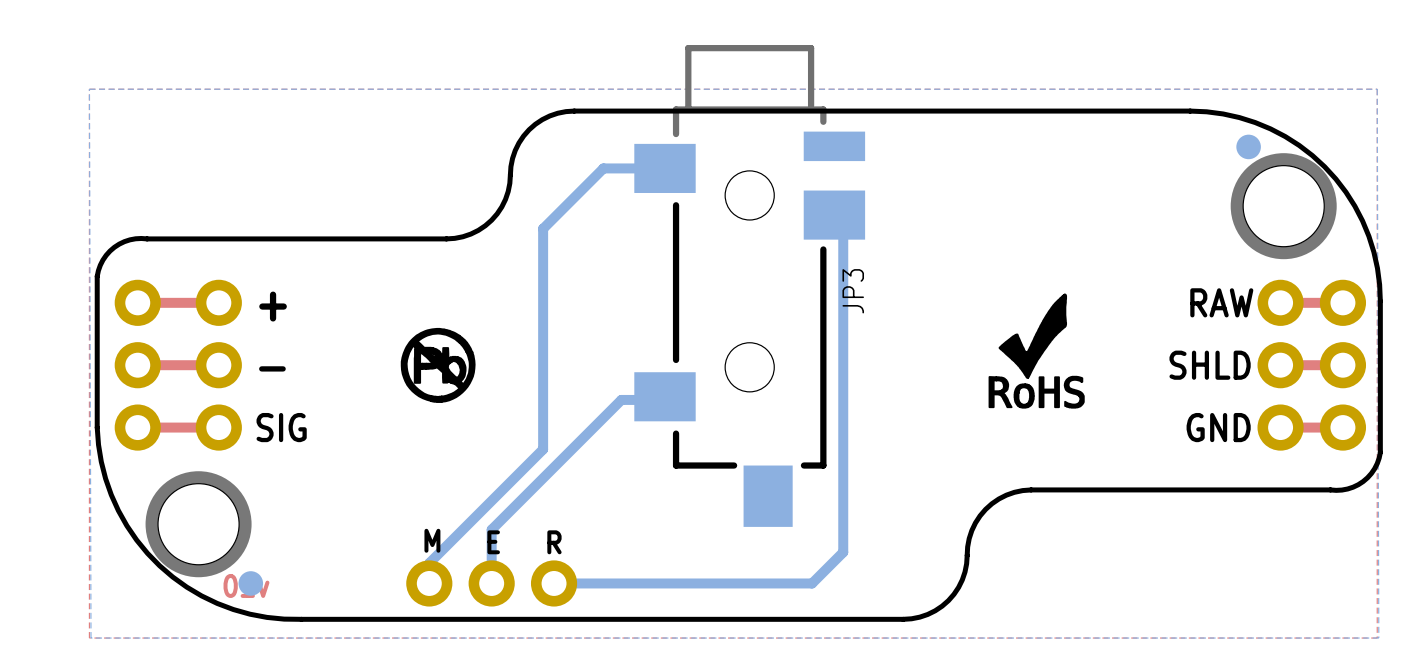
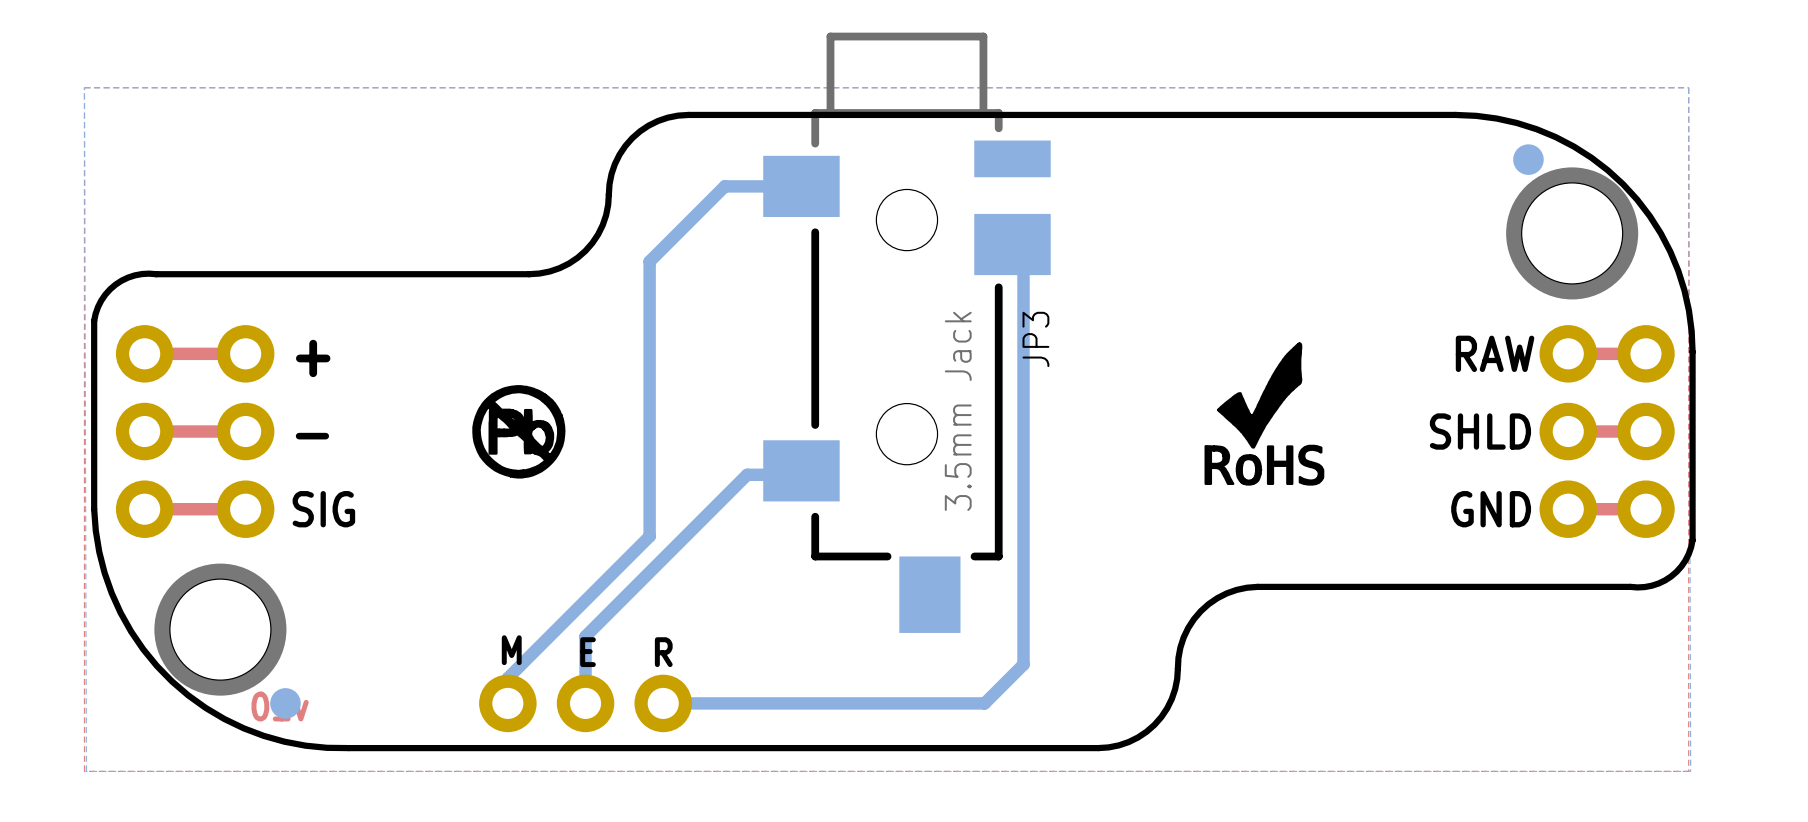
JP3 value: none -> 3.5mm Jack (958, 411)

